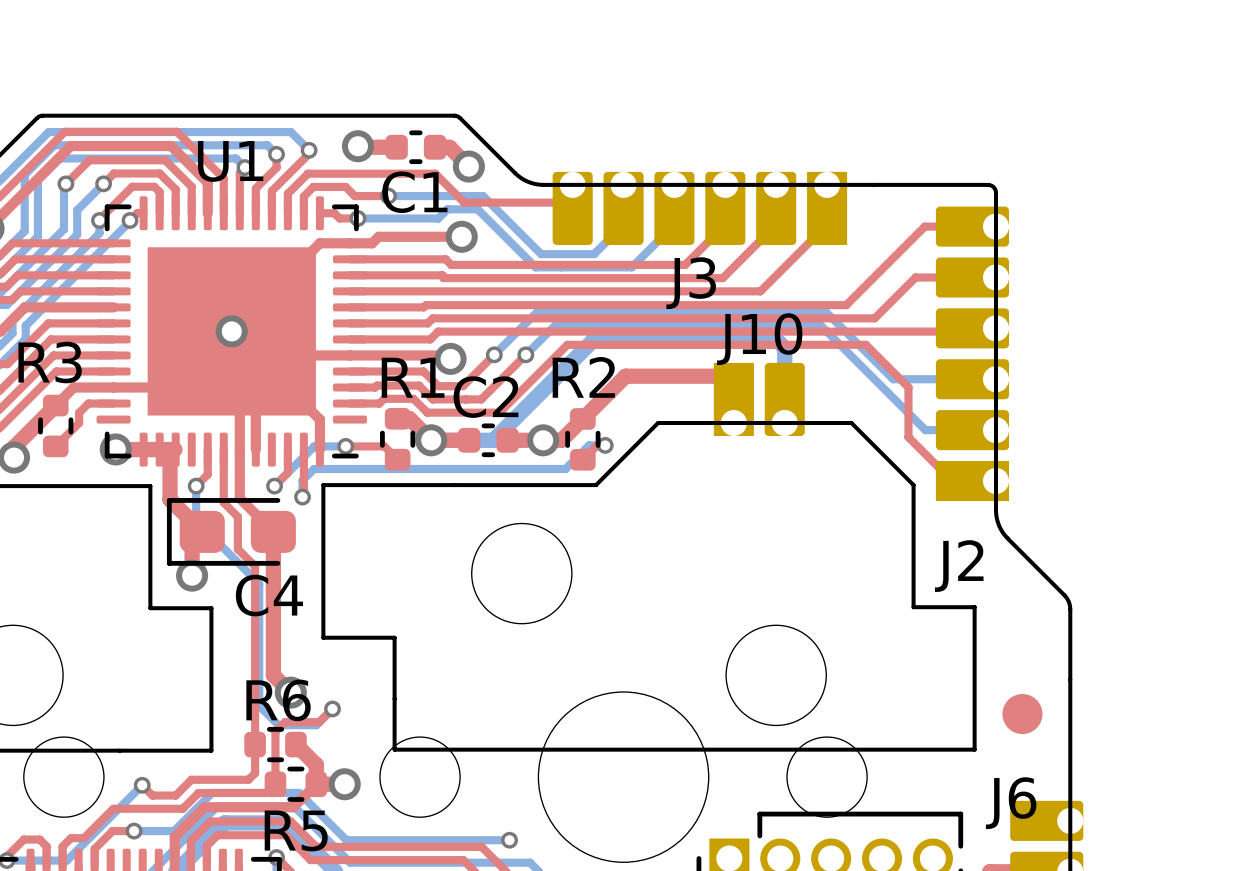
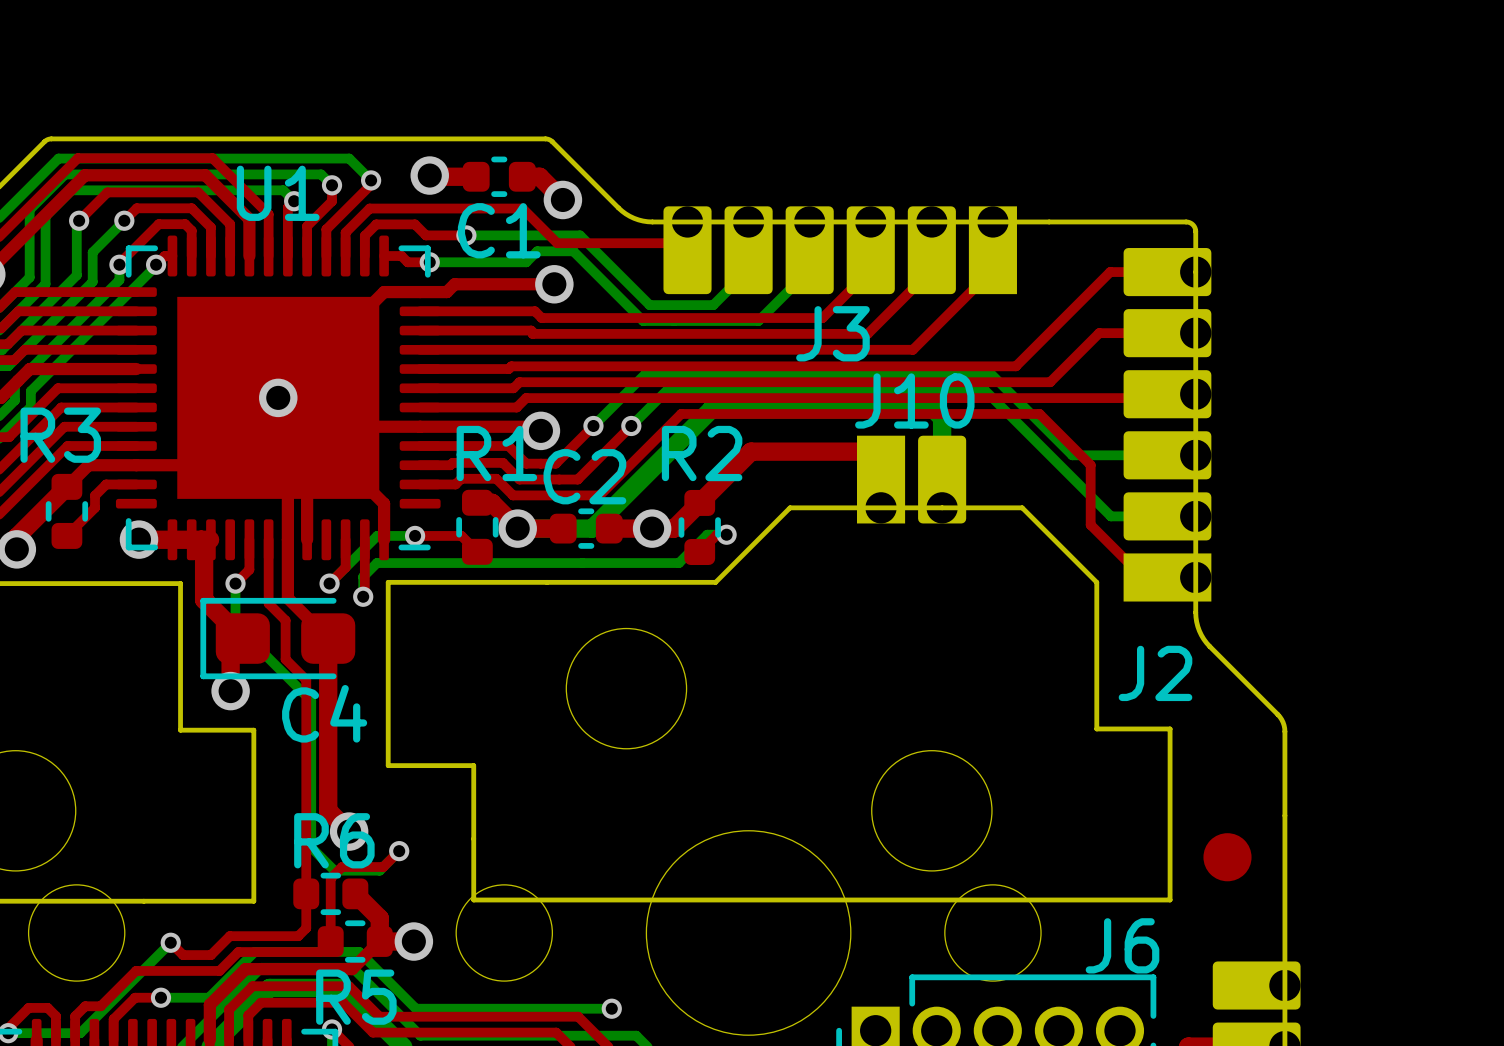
J6 name position: J6 (1011, 803) -> J6 (1122, 945)

